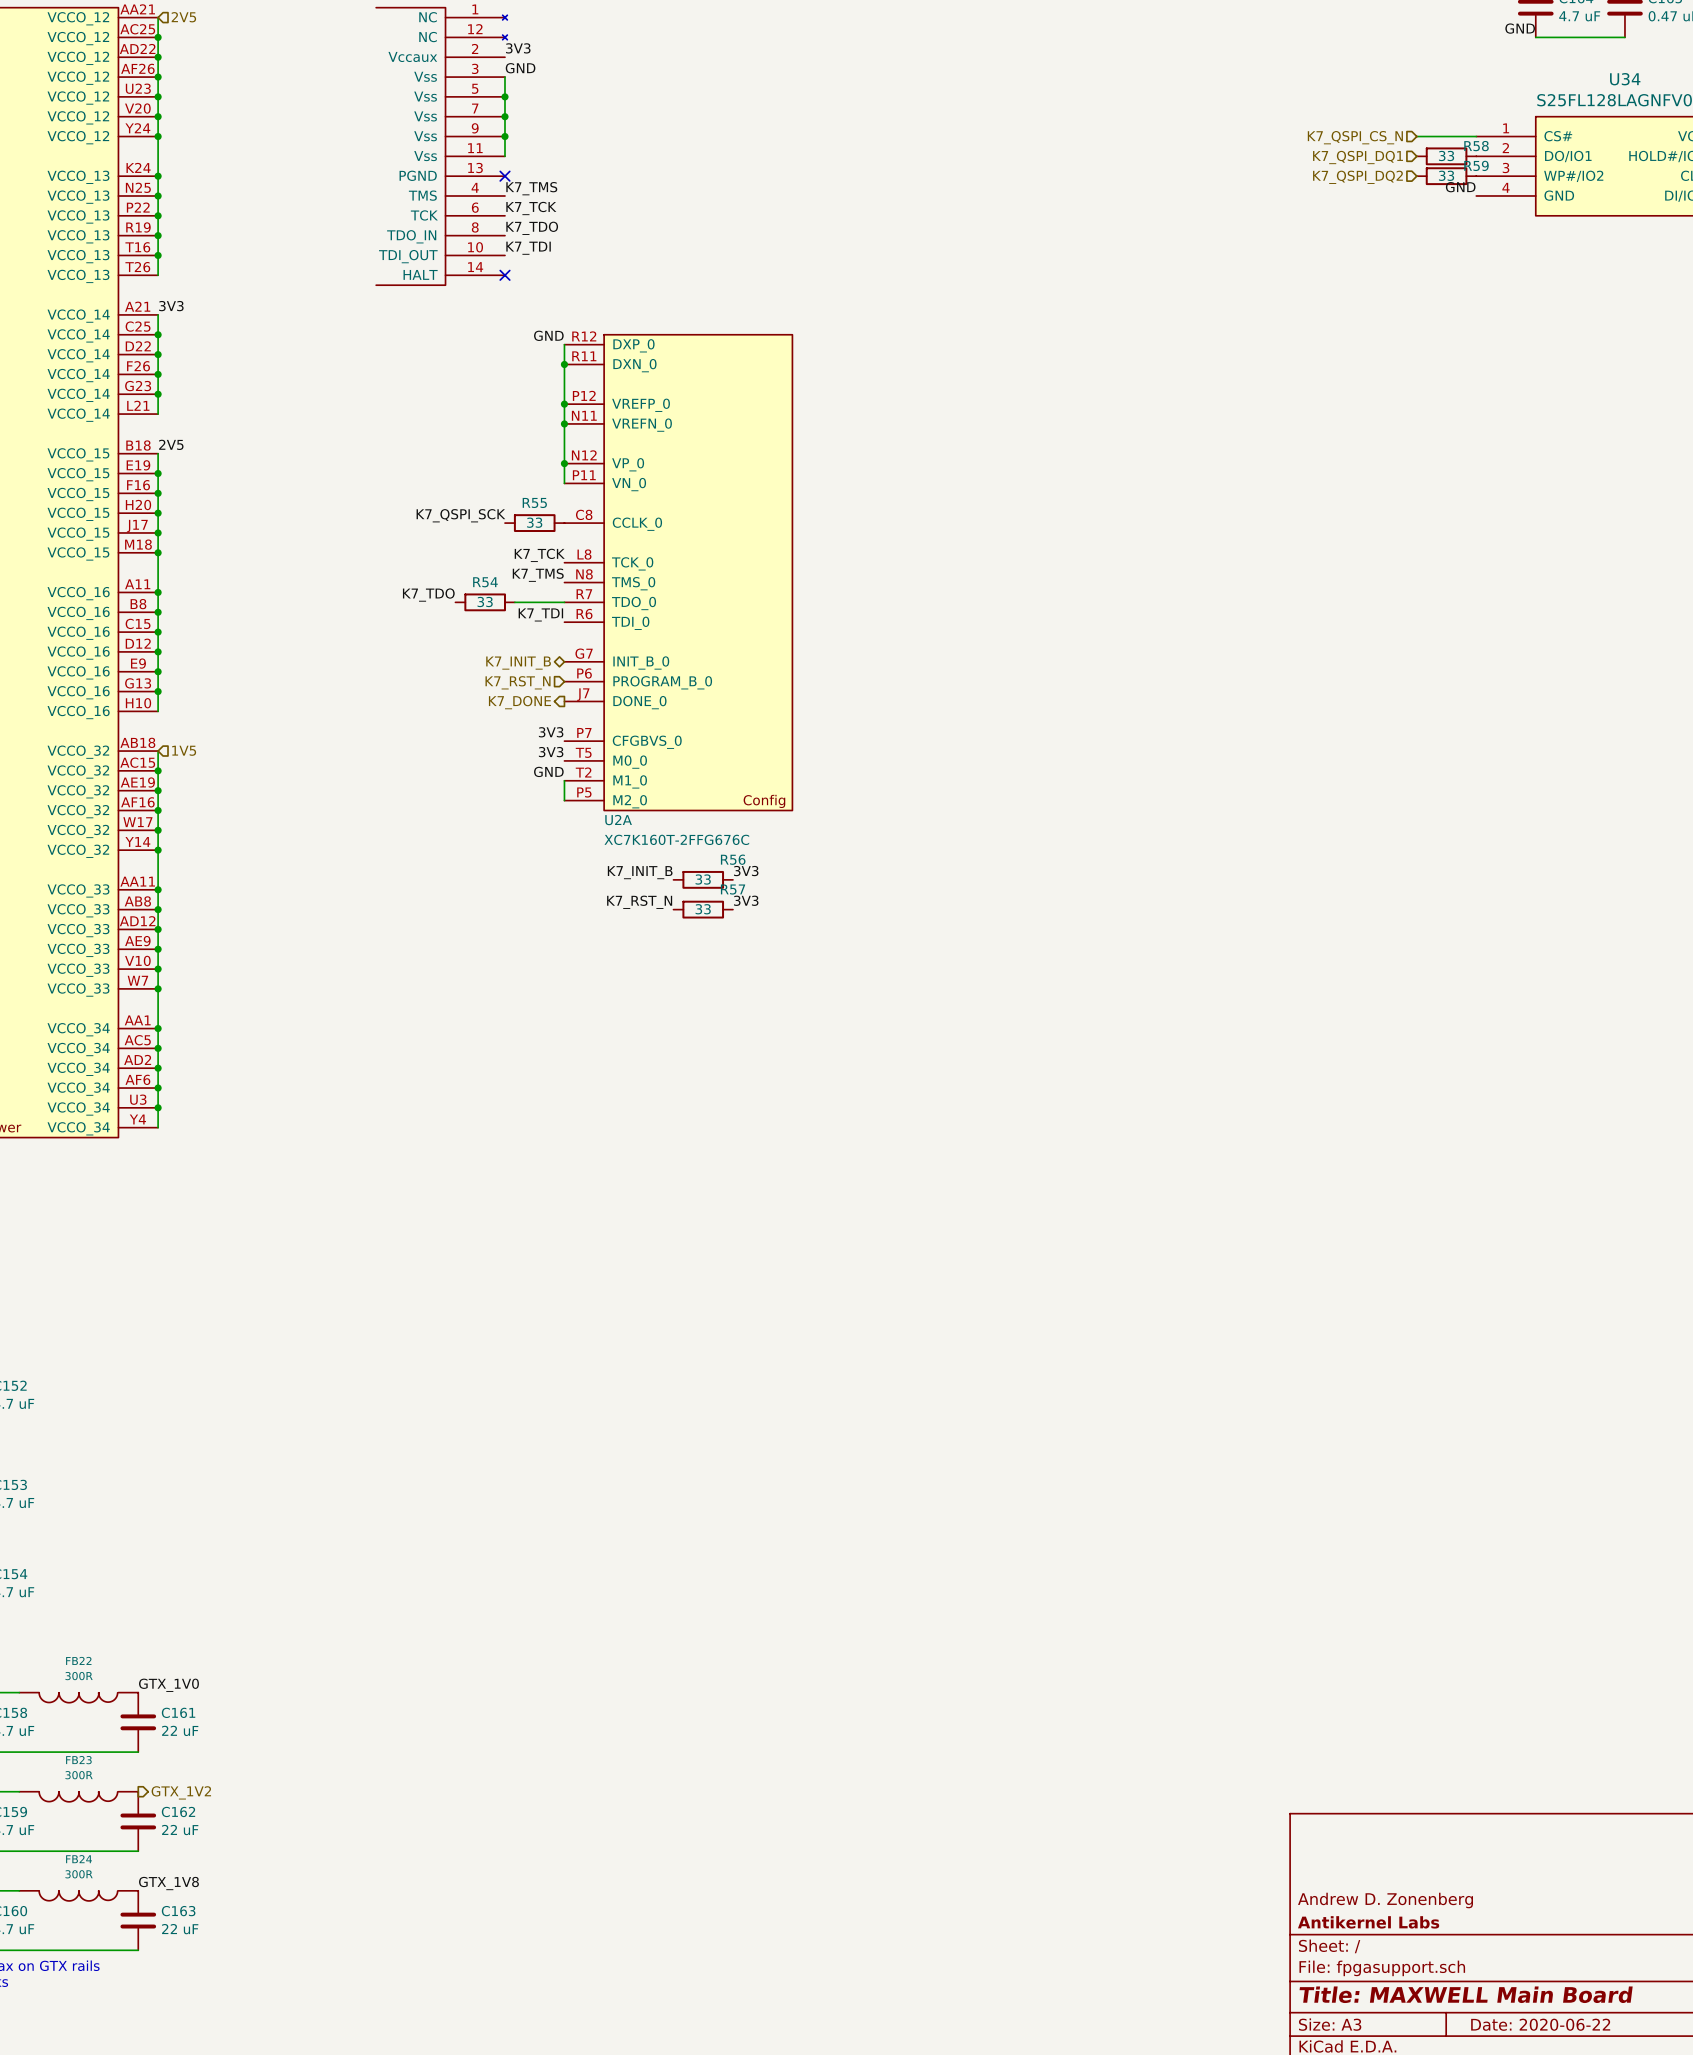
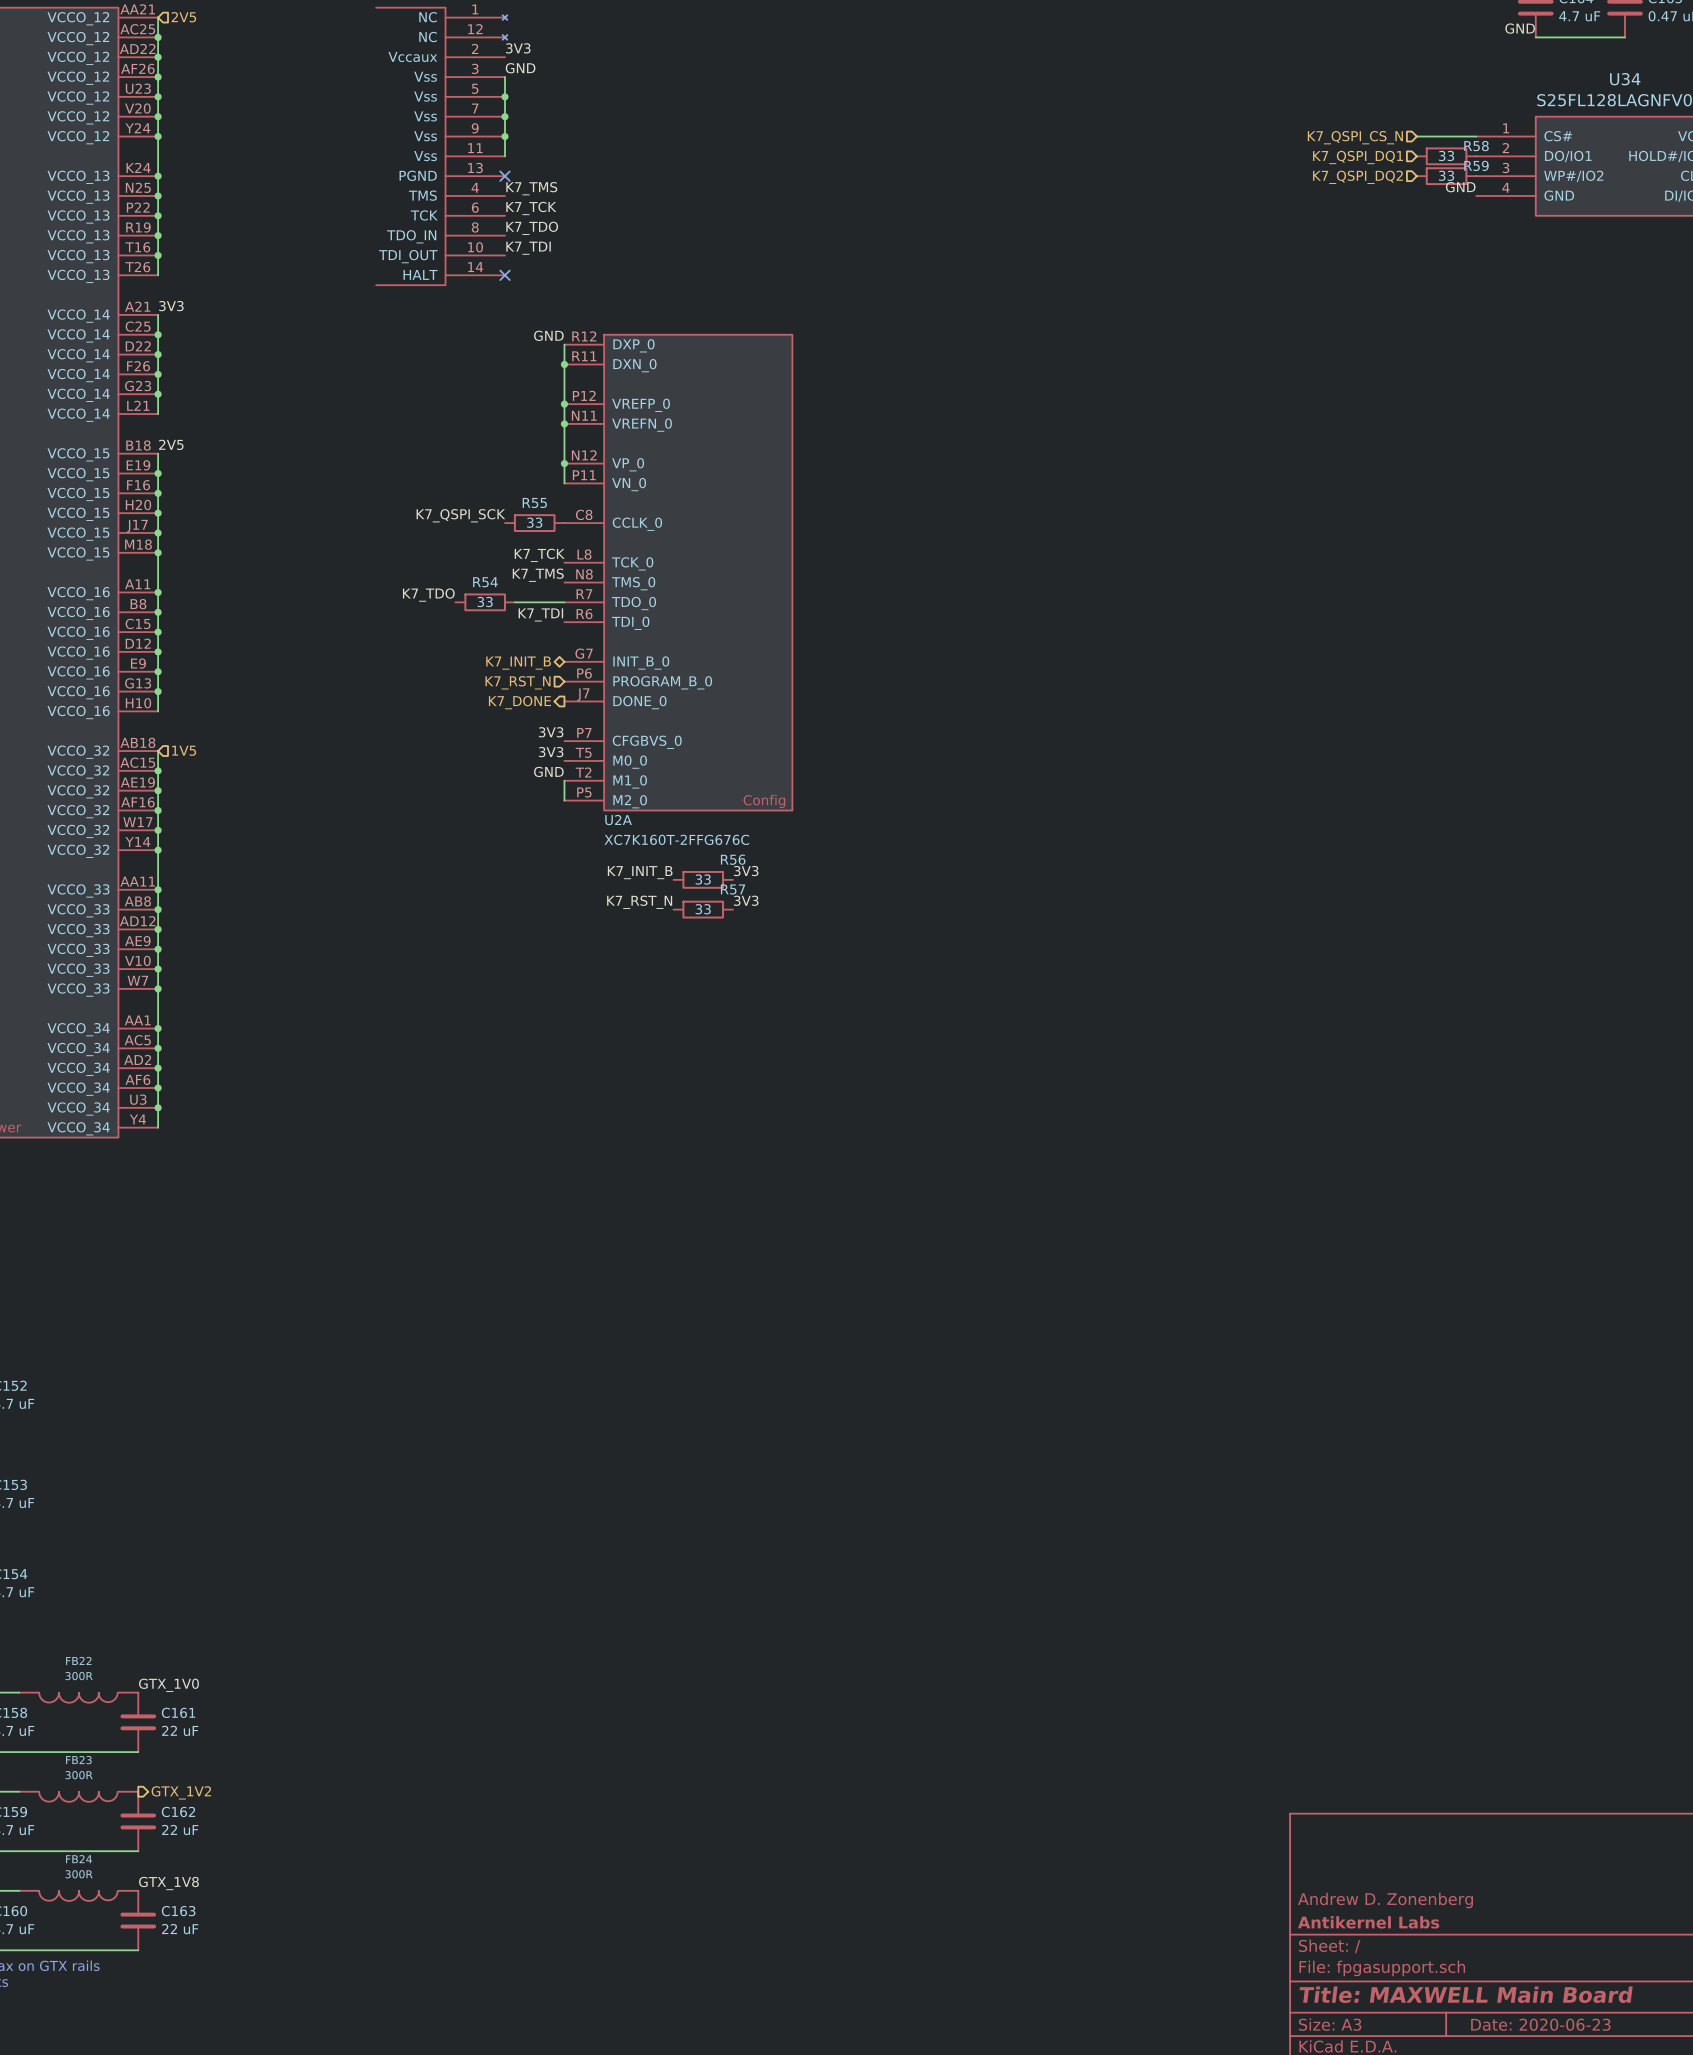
title block: Date: 2020-06-22 (1540, 2024) -> Date: 2020-06-23 (1540, 2024)

